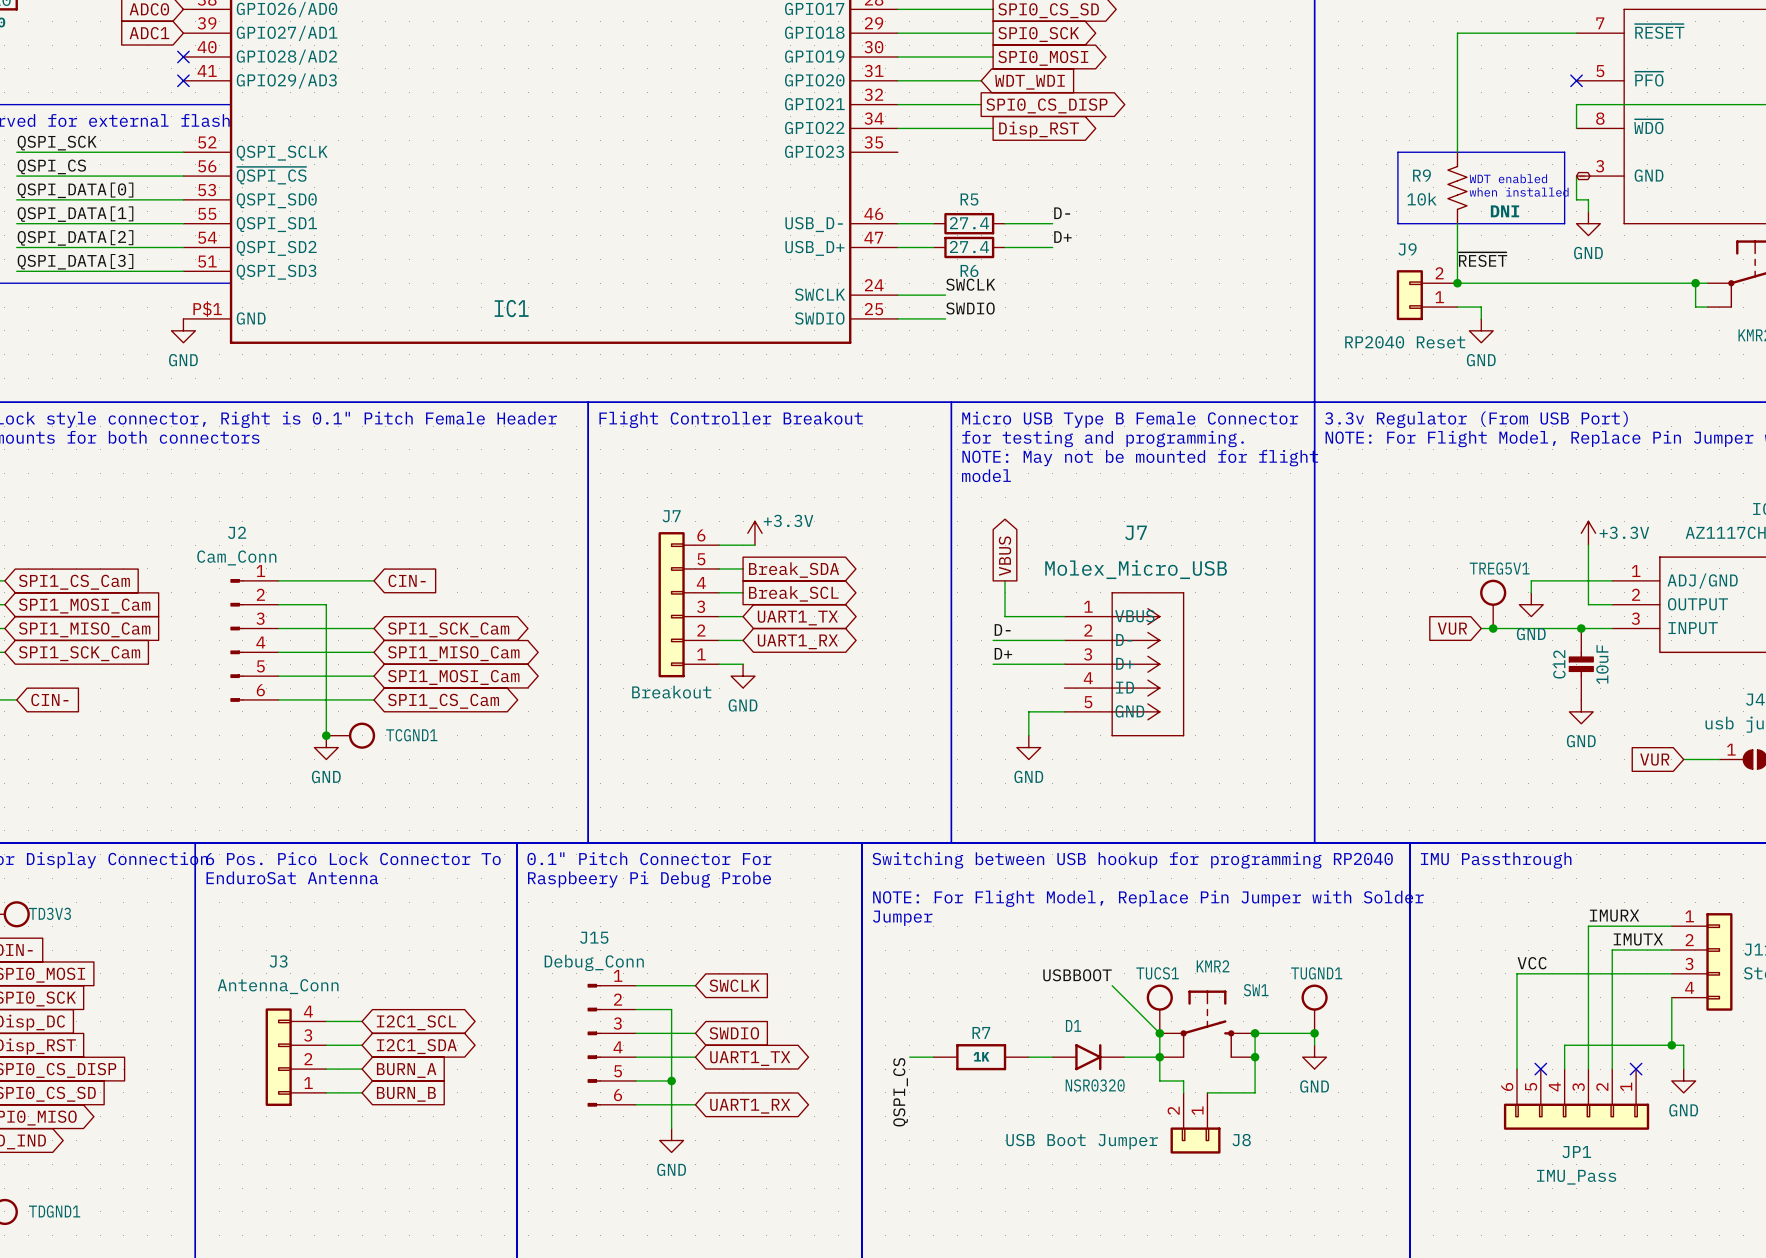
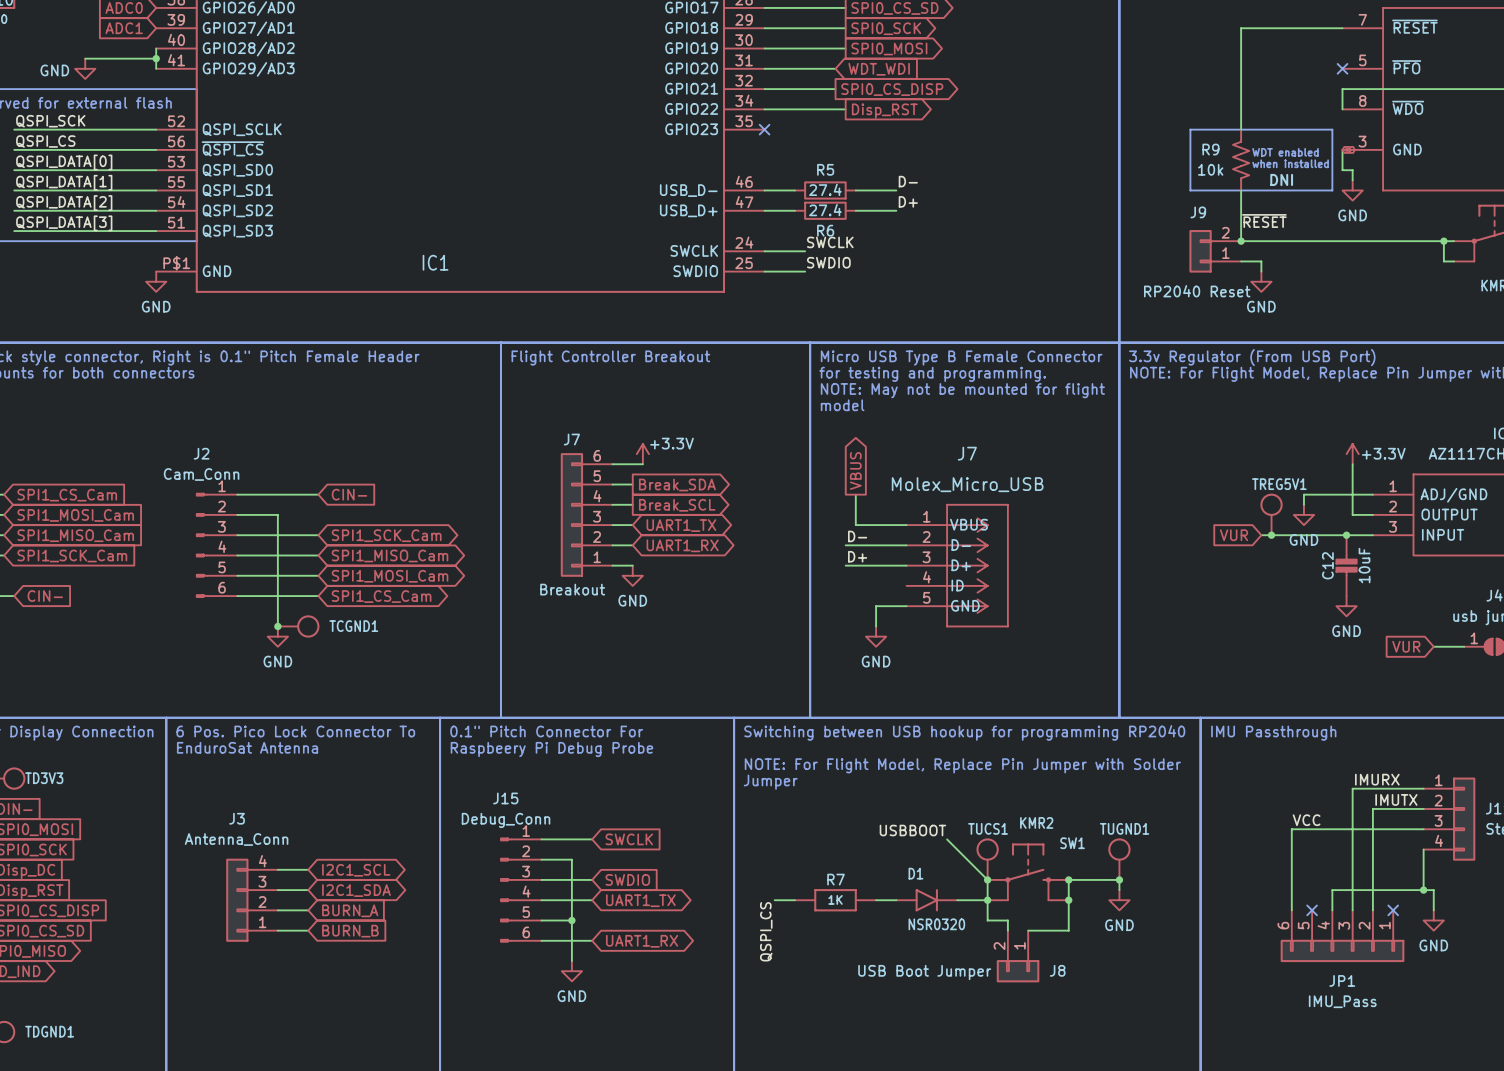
wire: none -> (156, 48) (156, 68)
no-connect mark: (183, 56) -> none
wire: none -> (85, 58) (156, 58)
junction: none -> (156, 58)
power symbol: none -> GND (85, 68)
no-connect mark: (183, 80) -> none
no-connect mark: none -> (764, 129)

